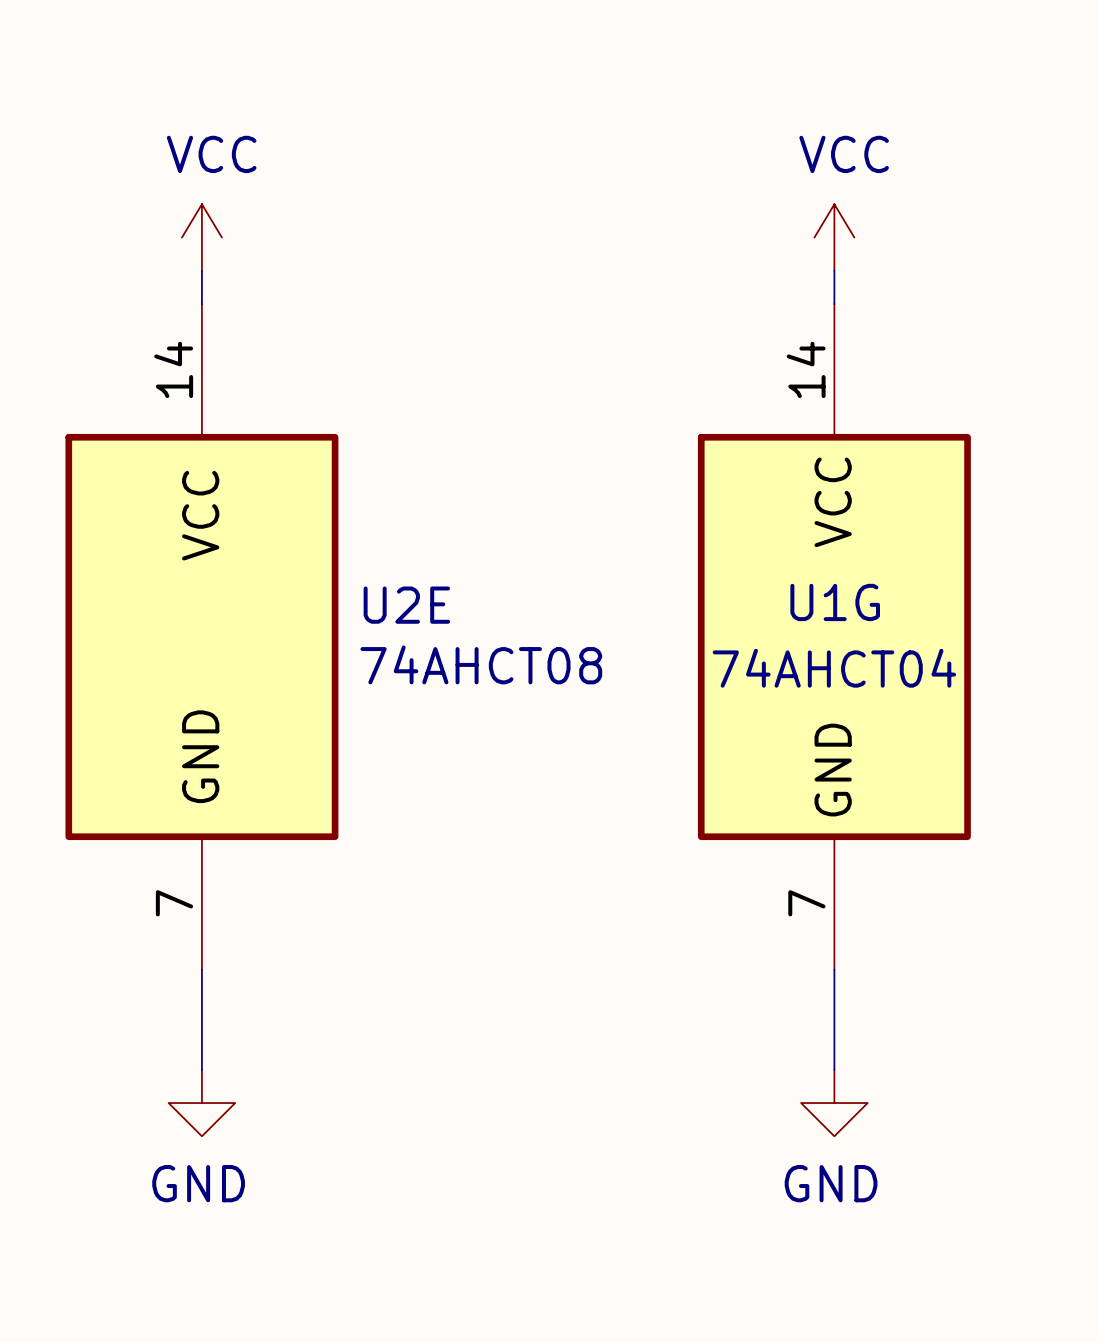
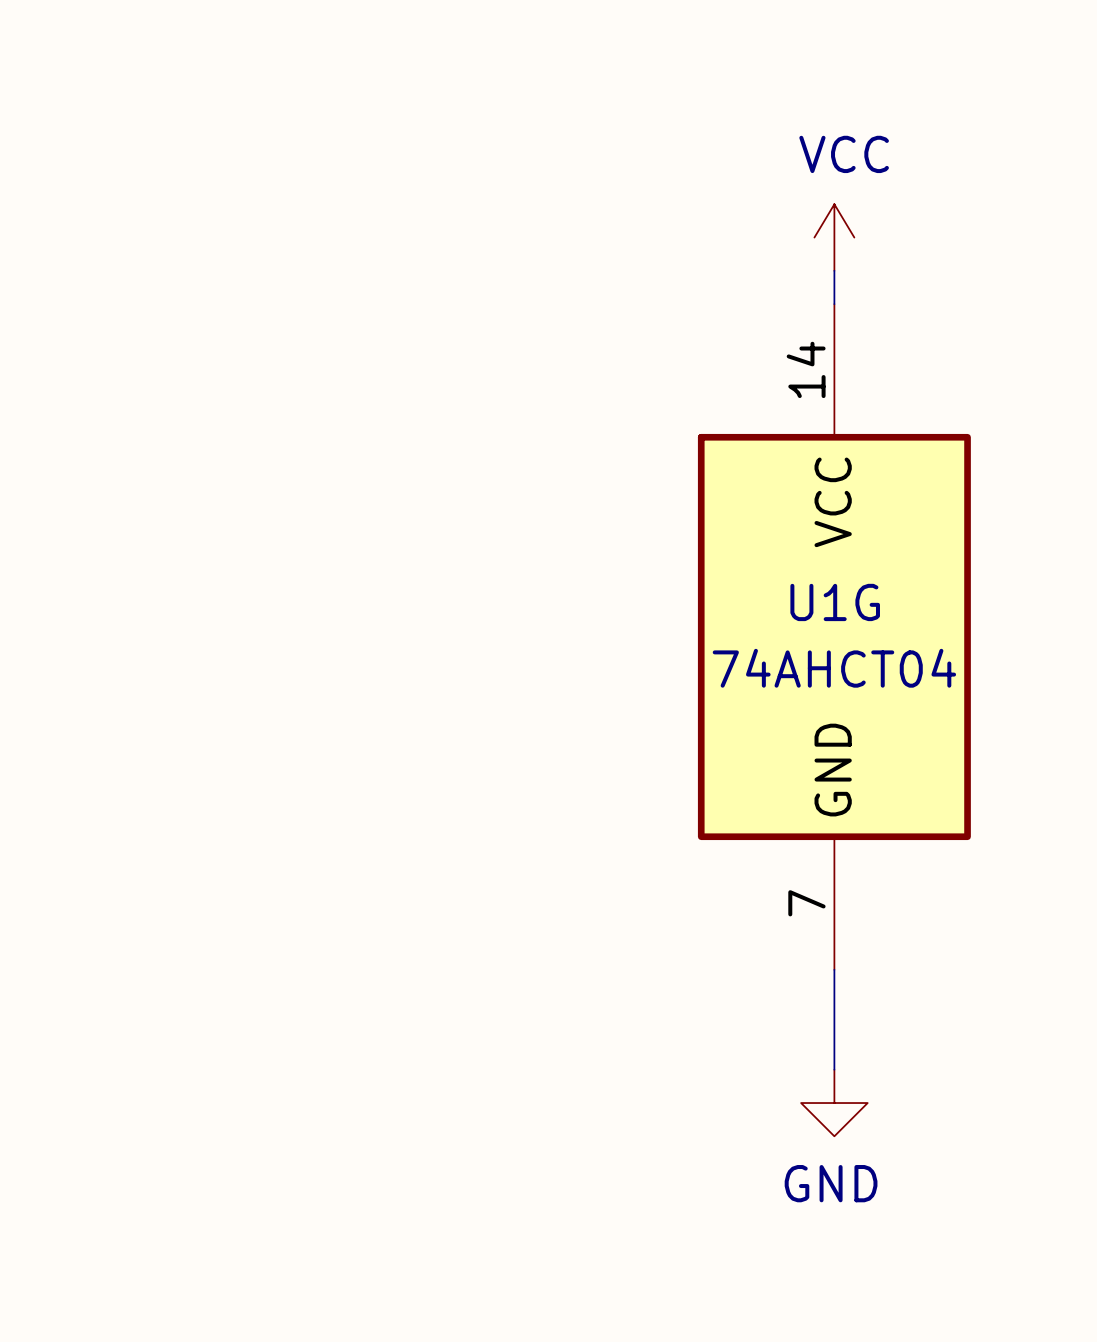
power symbol: VCC (201, 237) -> none
wire: (201, 270) (201, 304) -> none
U2E: 74AHCT08 (201, 637) -> none
wire: (201, 969) (201, 1069) -> none
power symbol: GND (201, 1103) -> none

